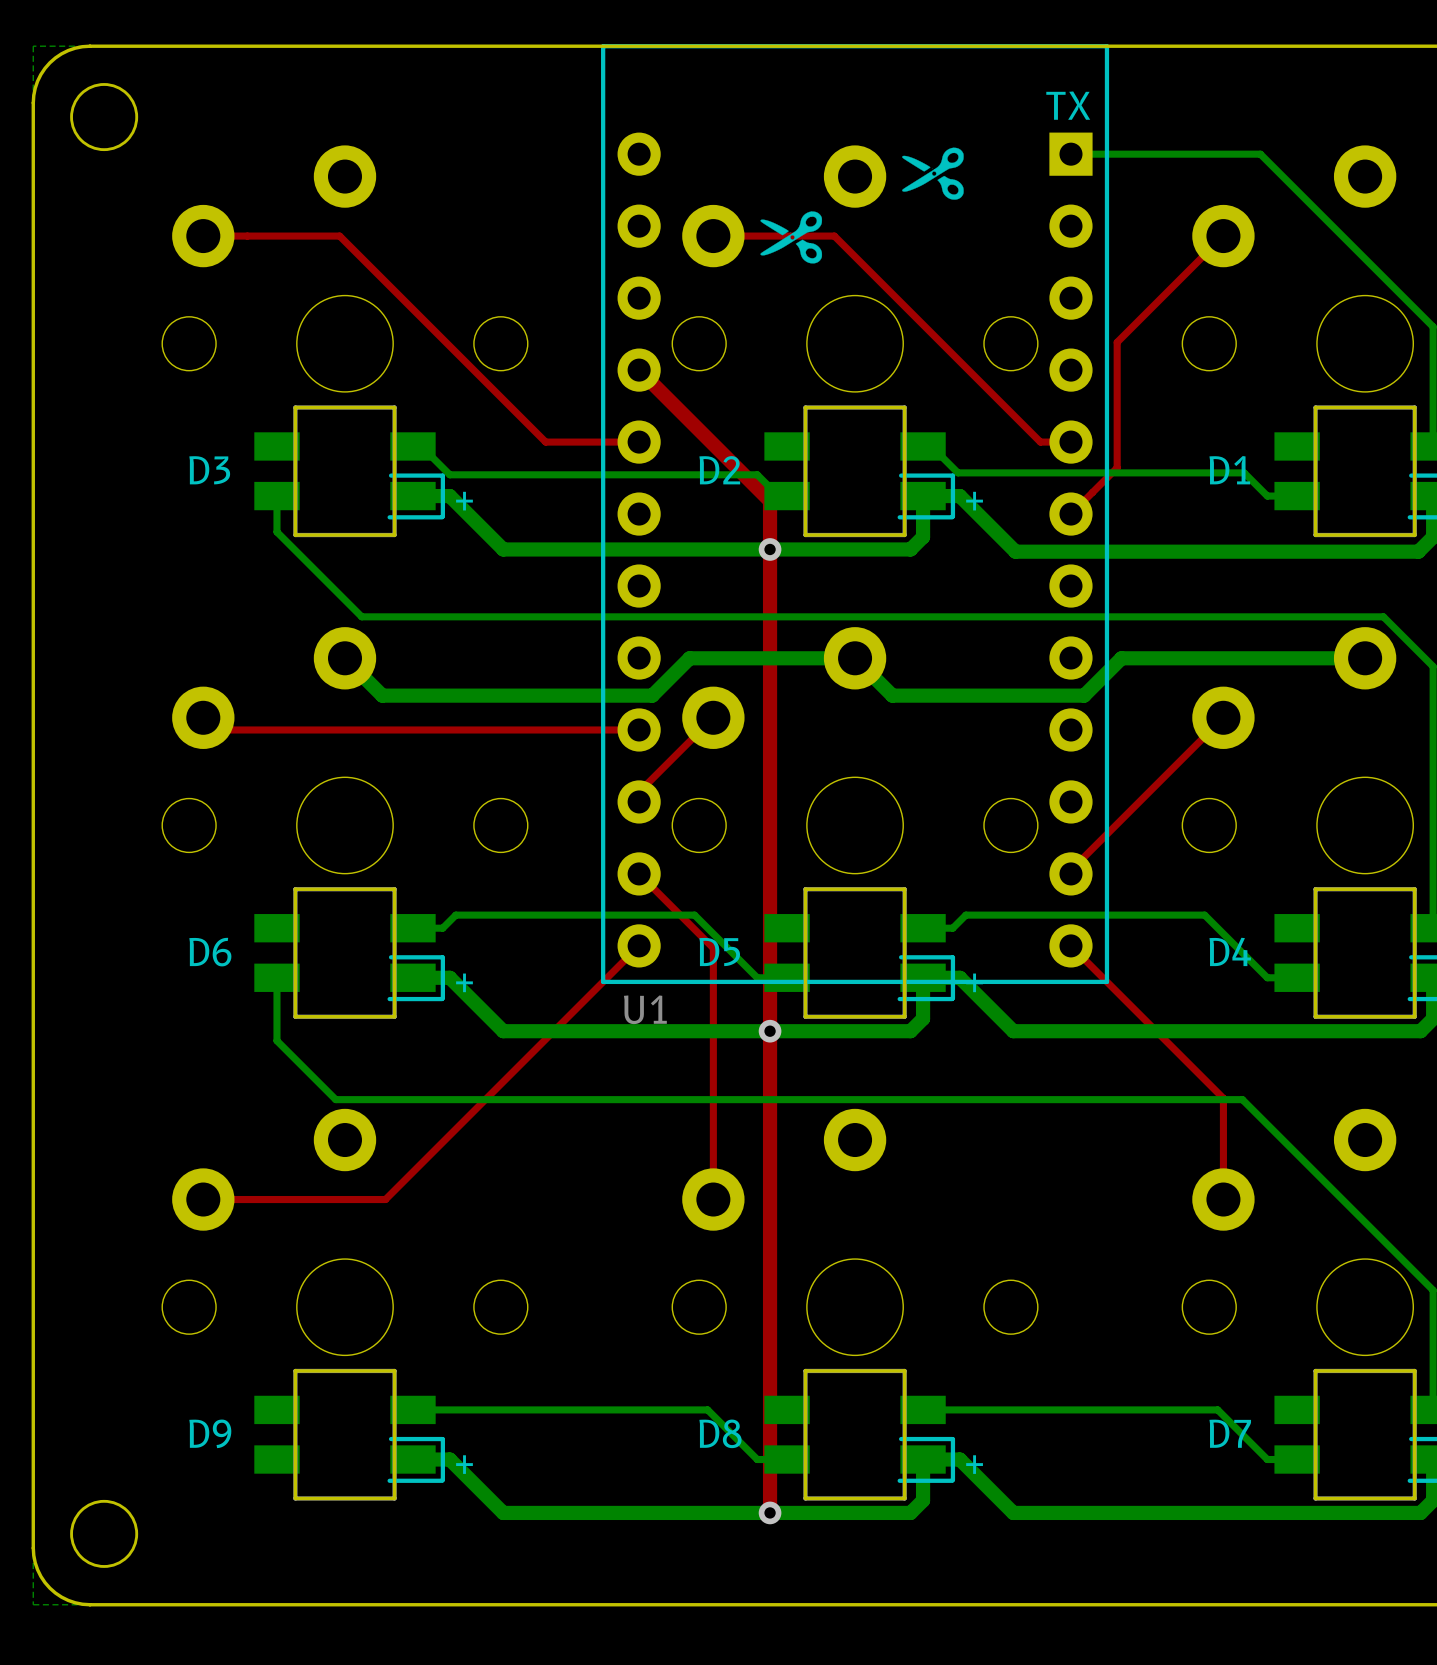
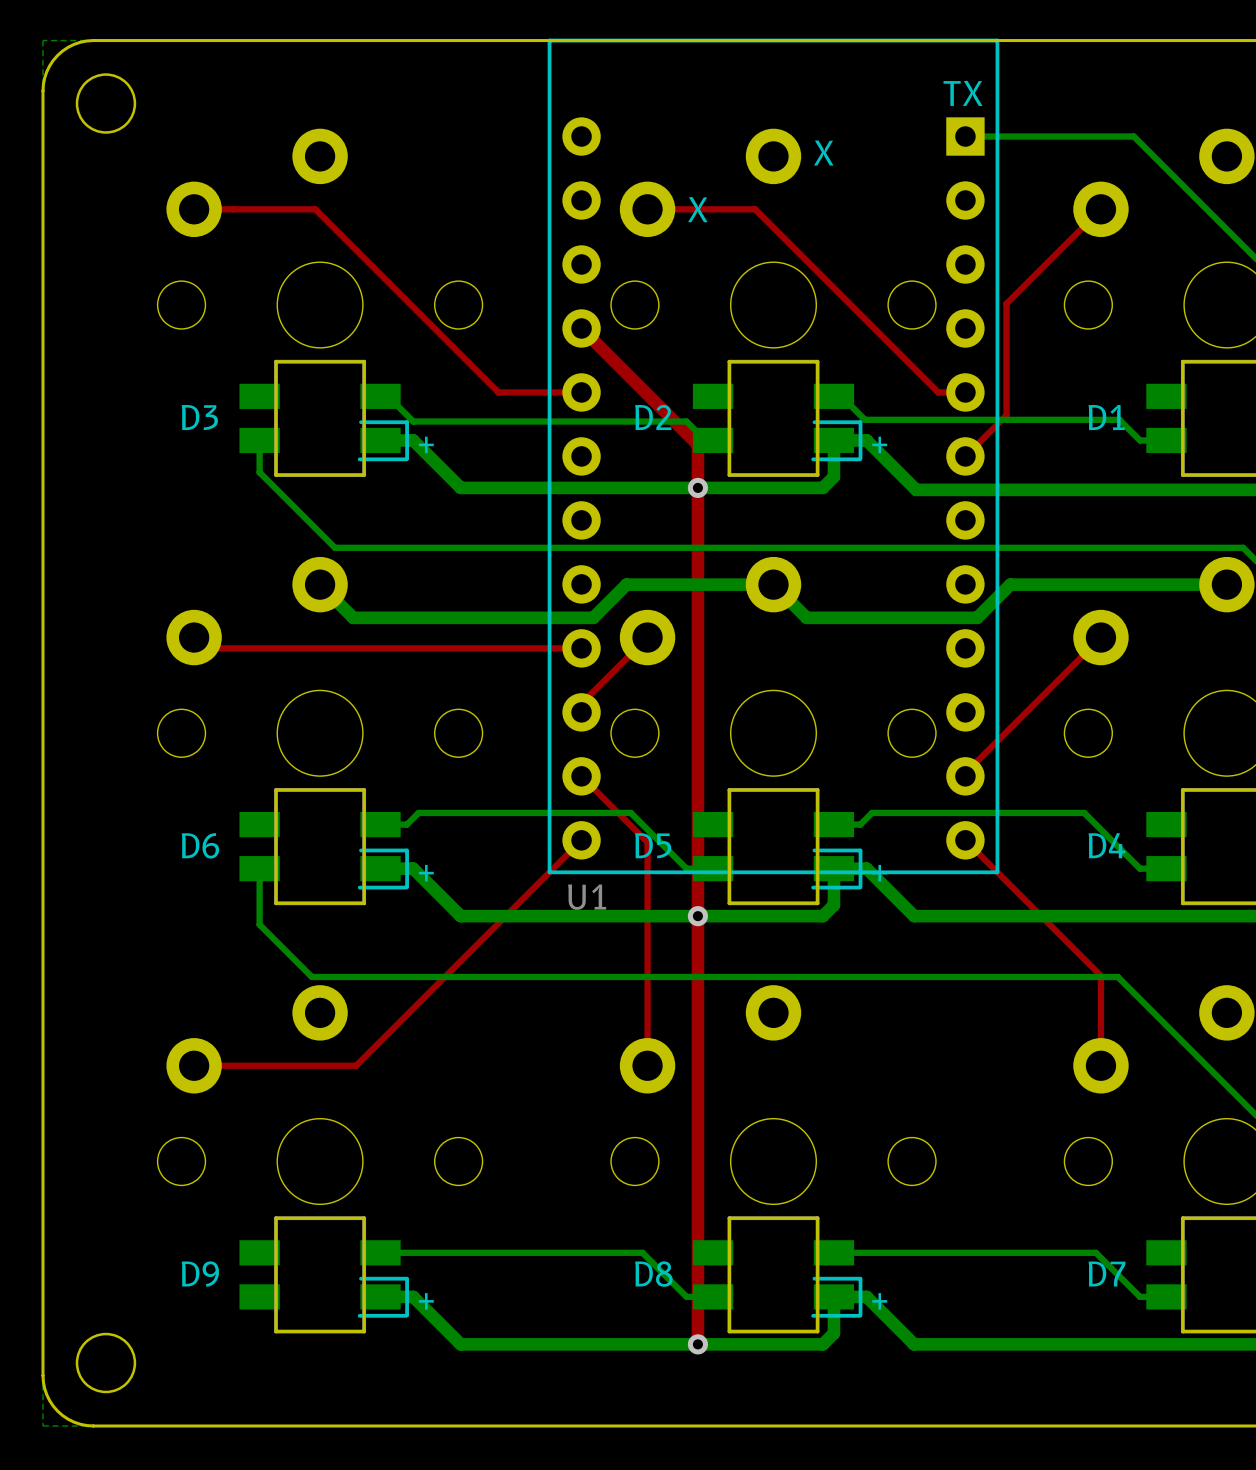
drawing: [902, 147, 964, 200] -> none
text: none -> X (823, 152)
drawing: [760, 211, 823, 264] -> none
text: none -> X (697, 209)

